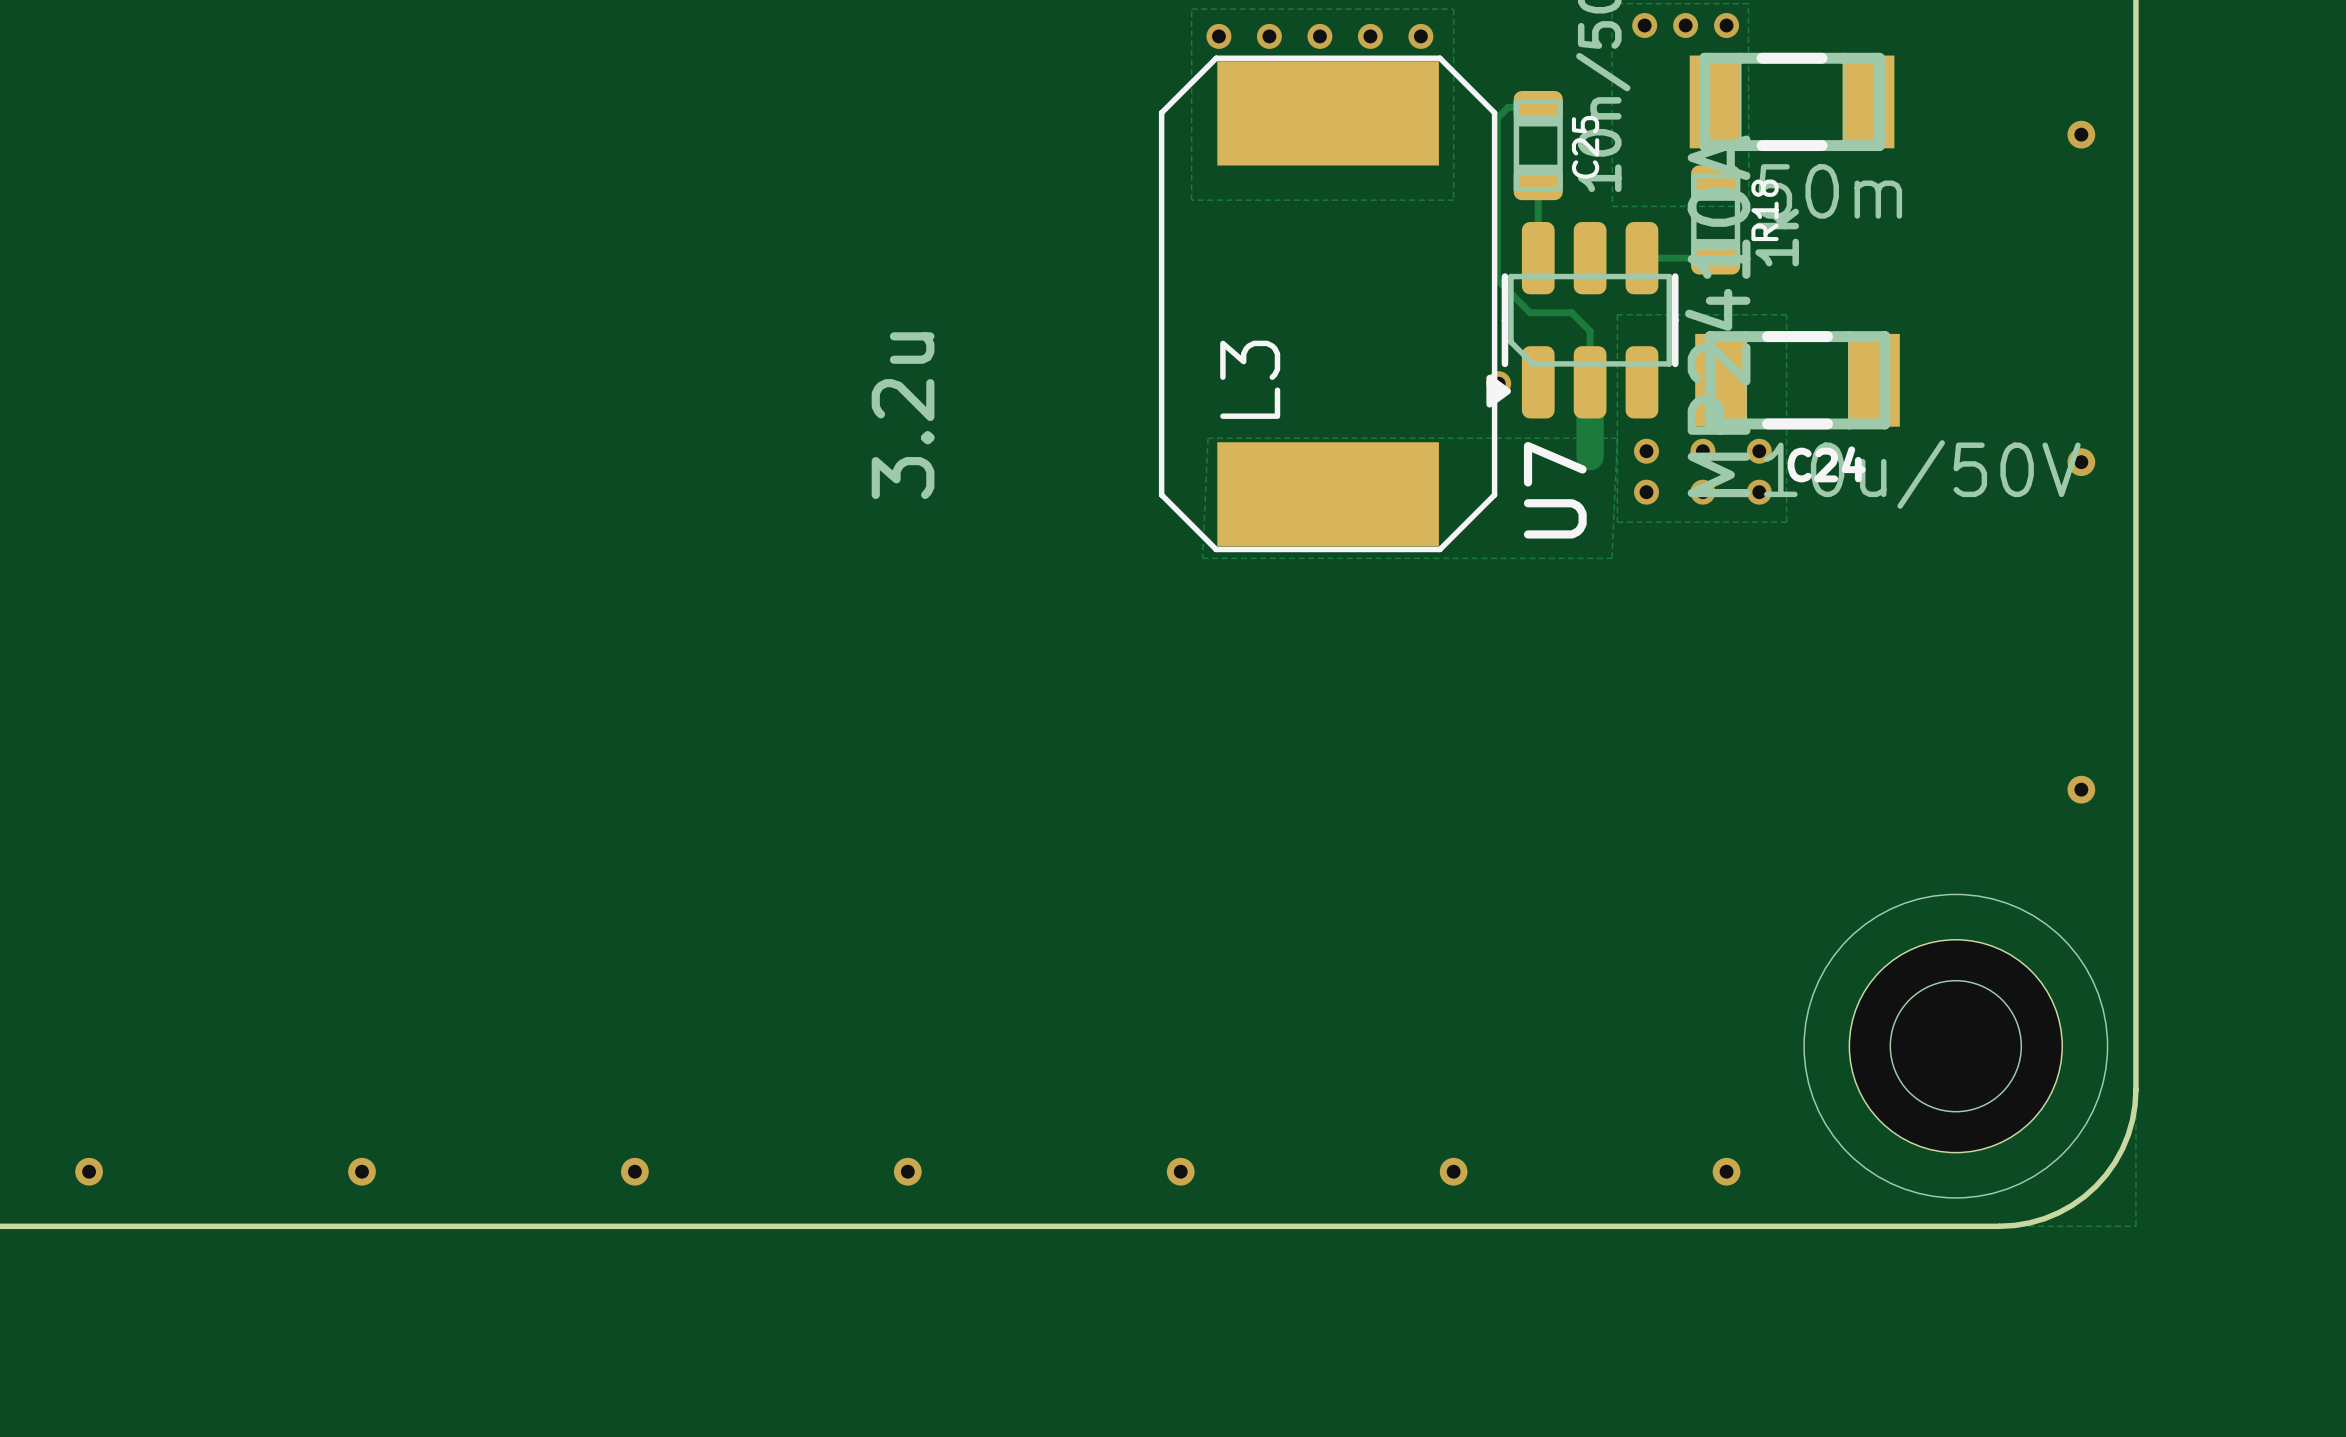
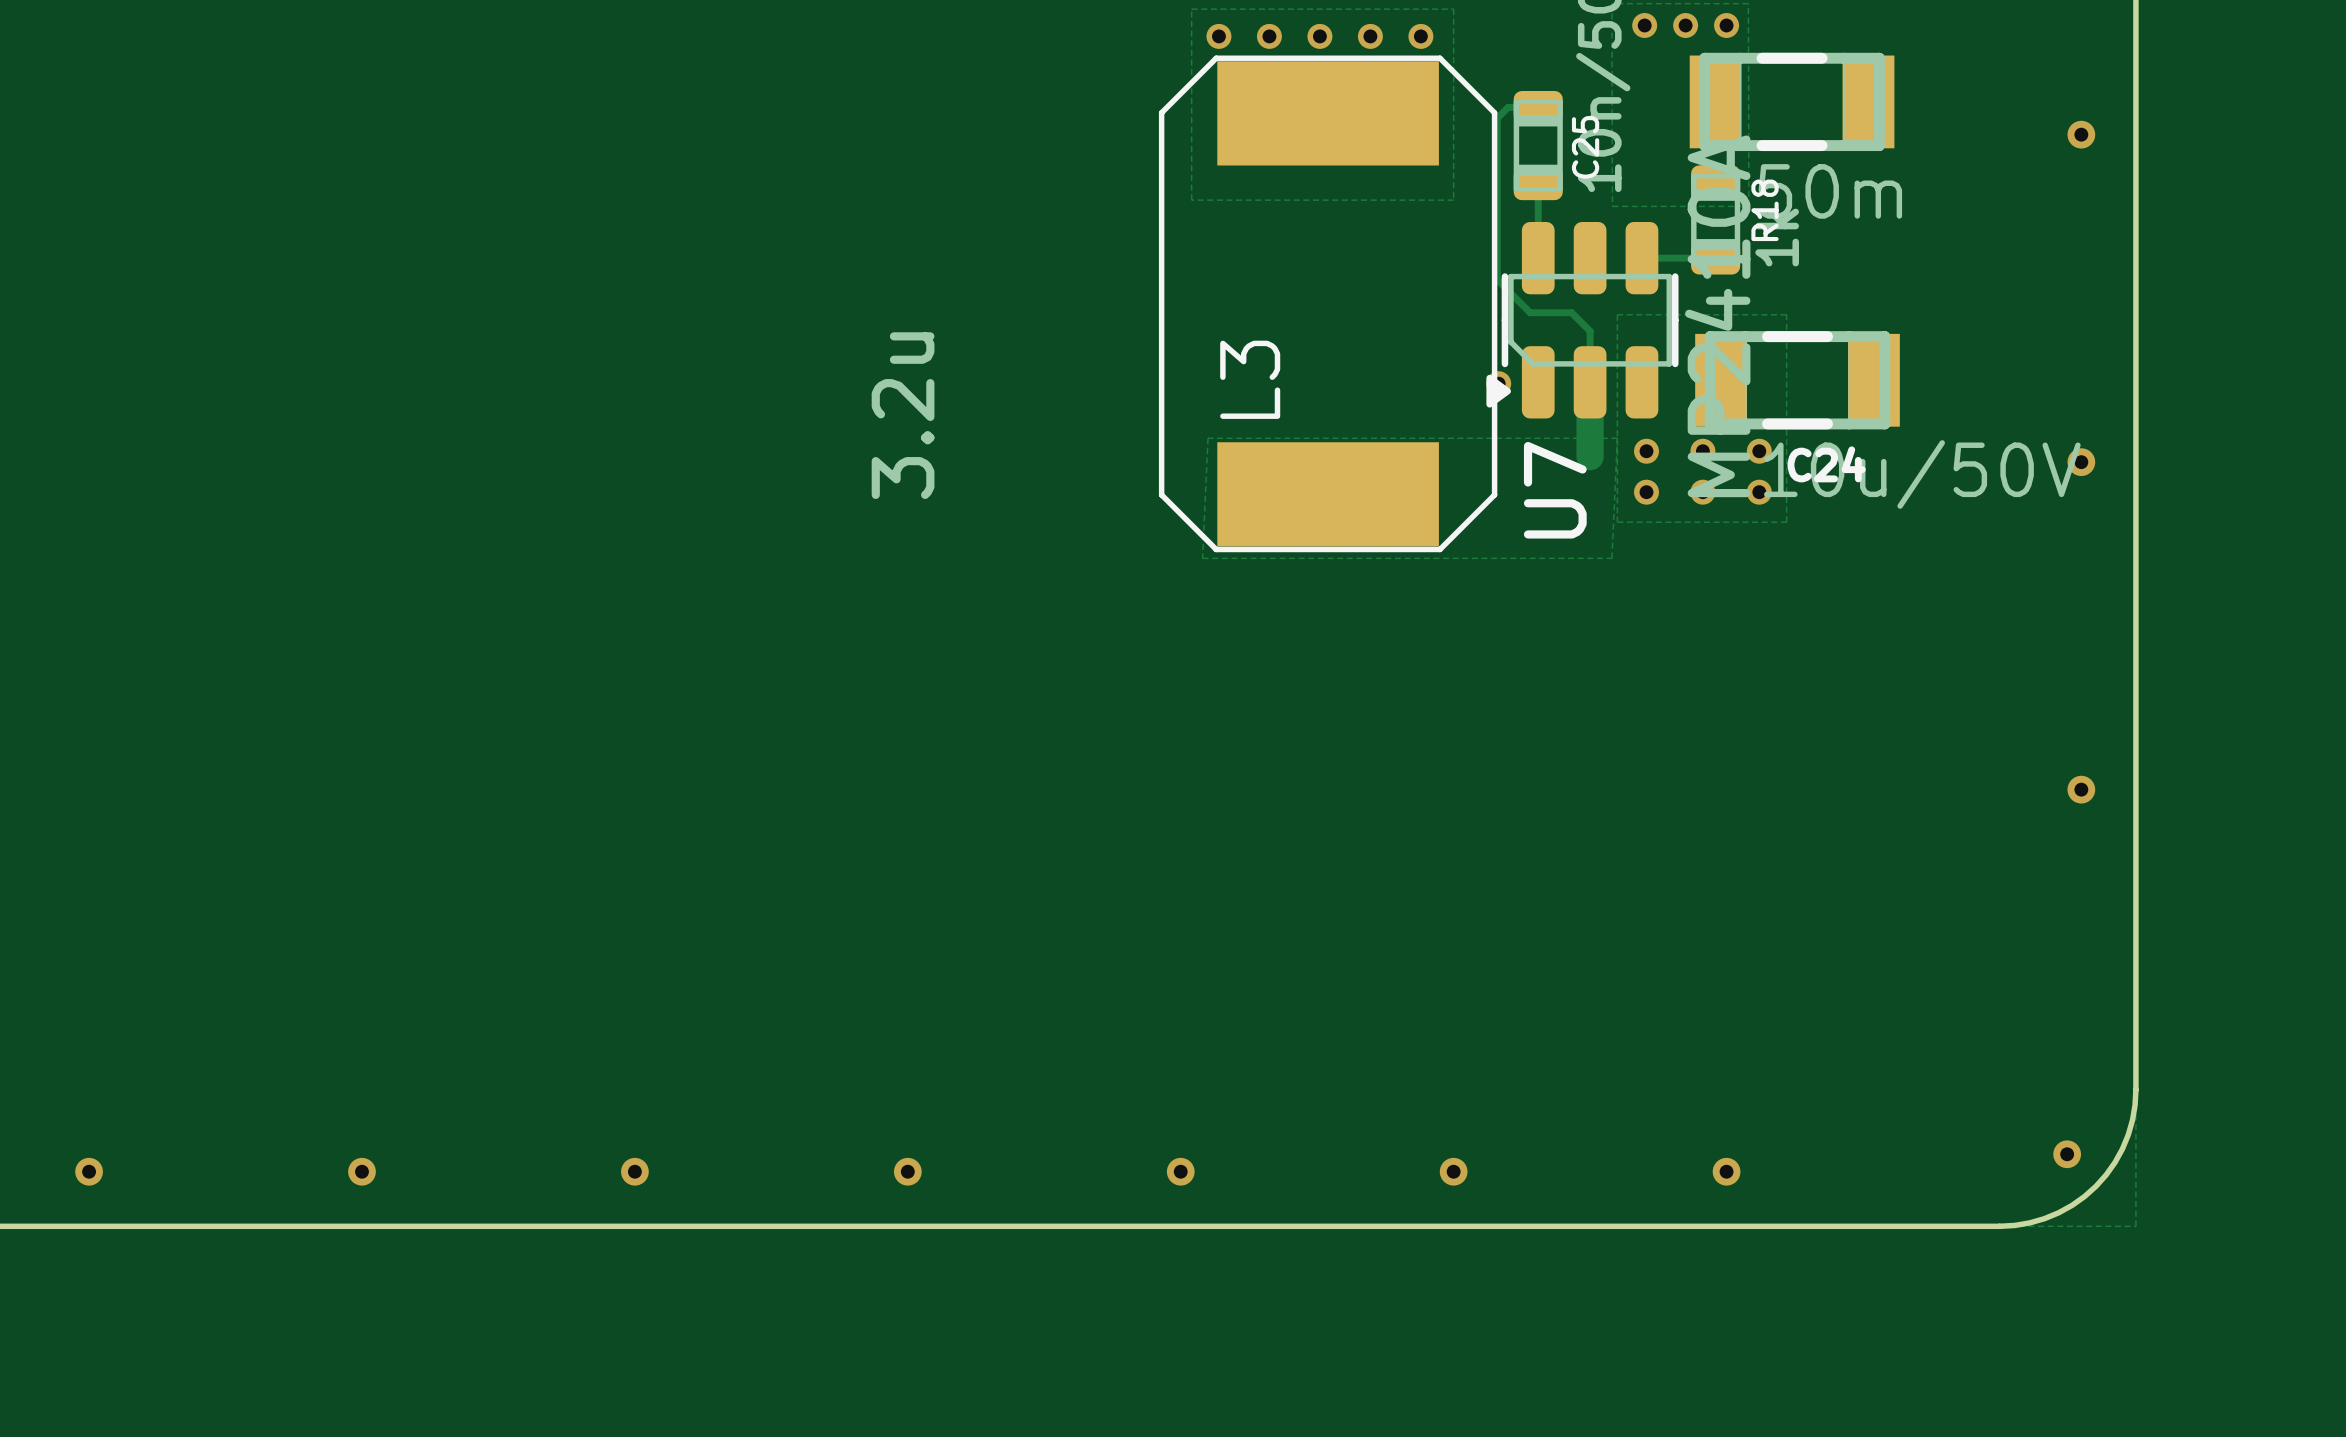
part: (1955, 1046) -> none
via: none -> (2067, 1154)

